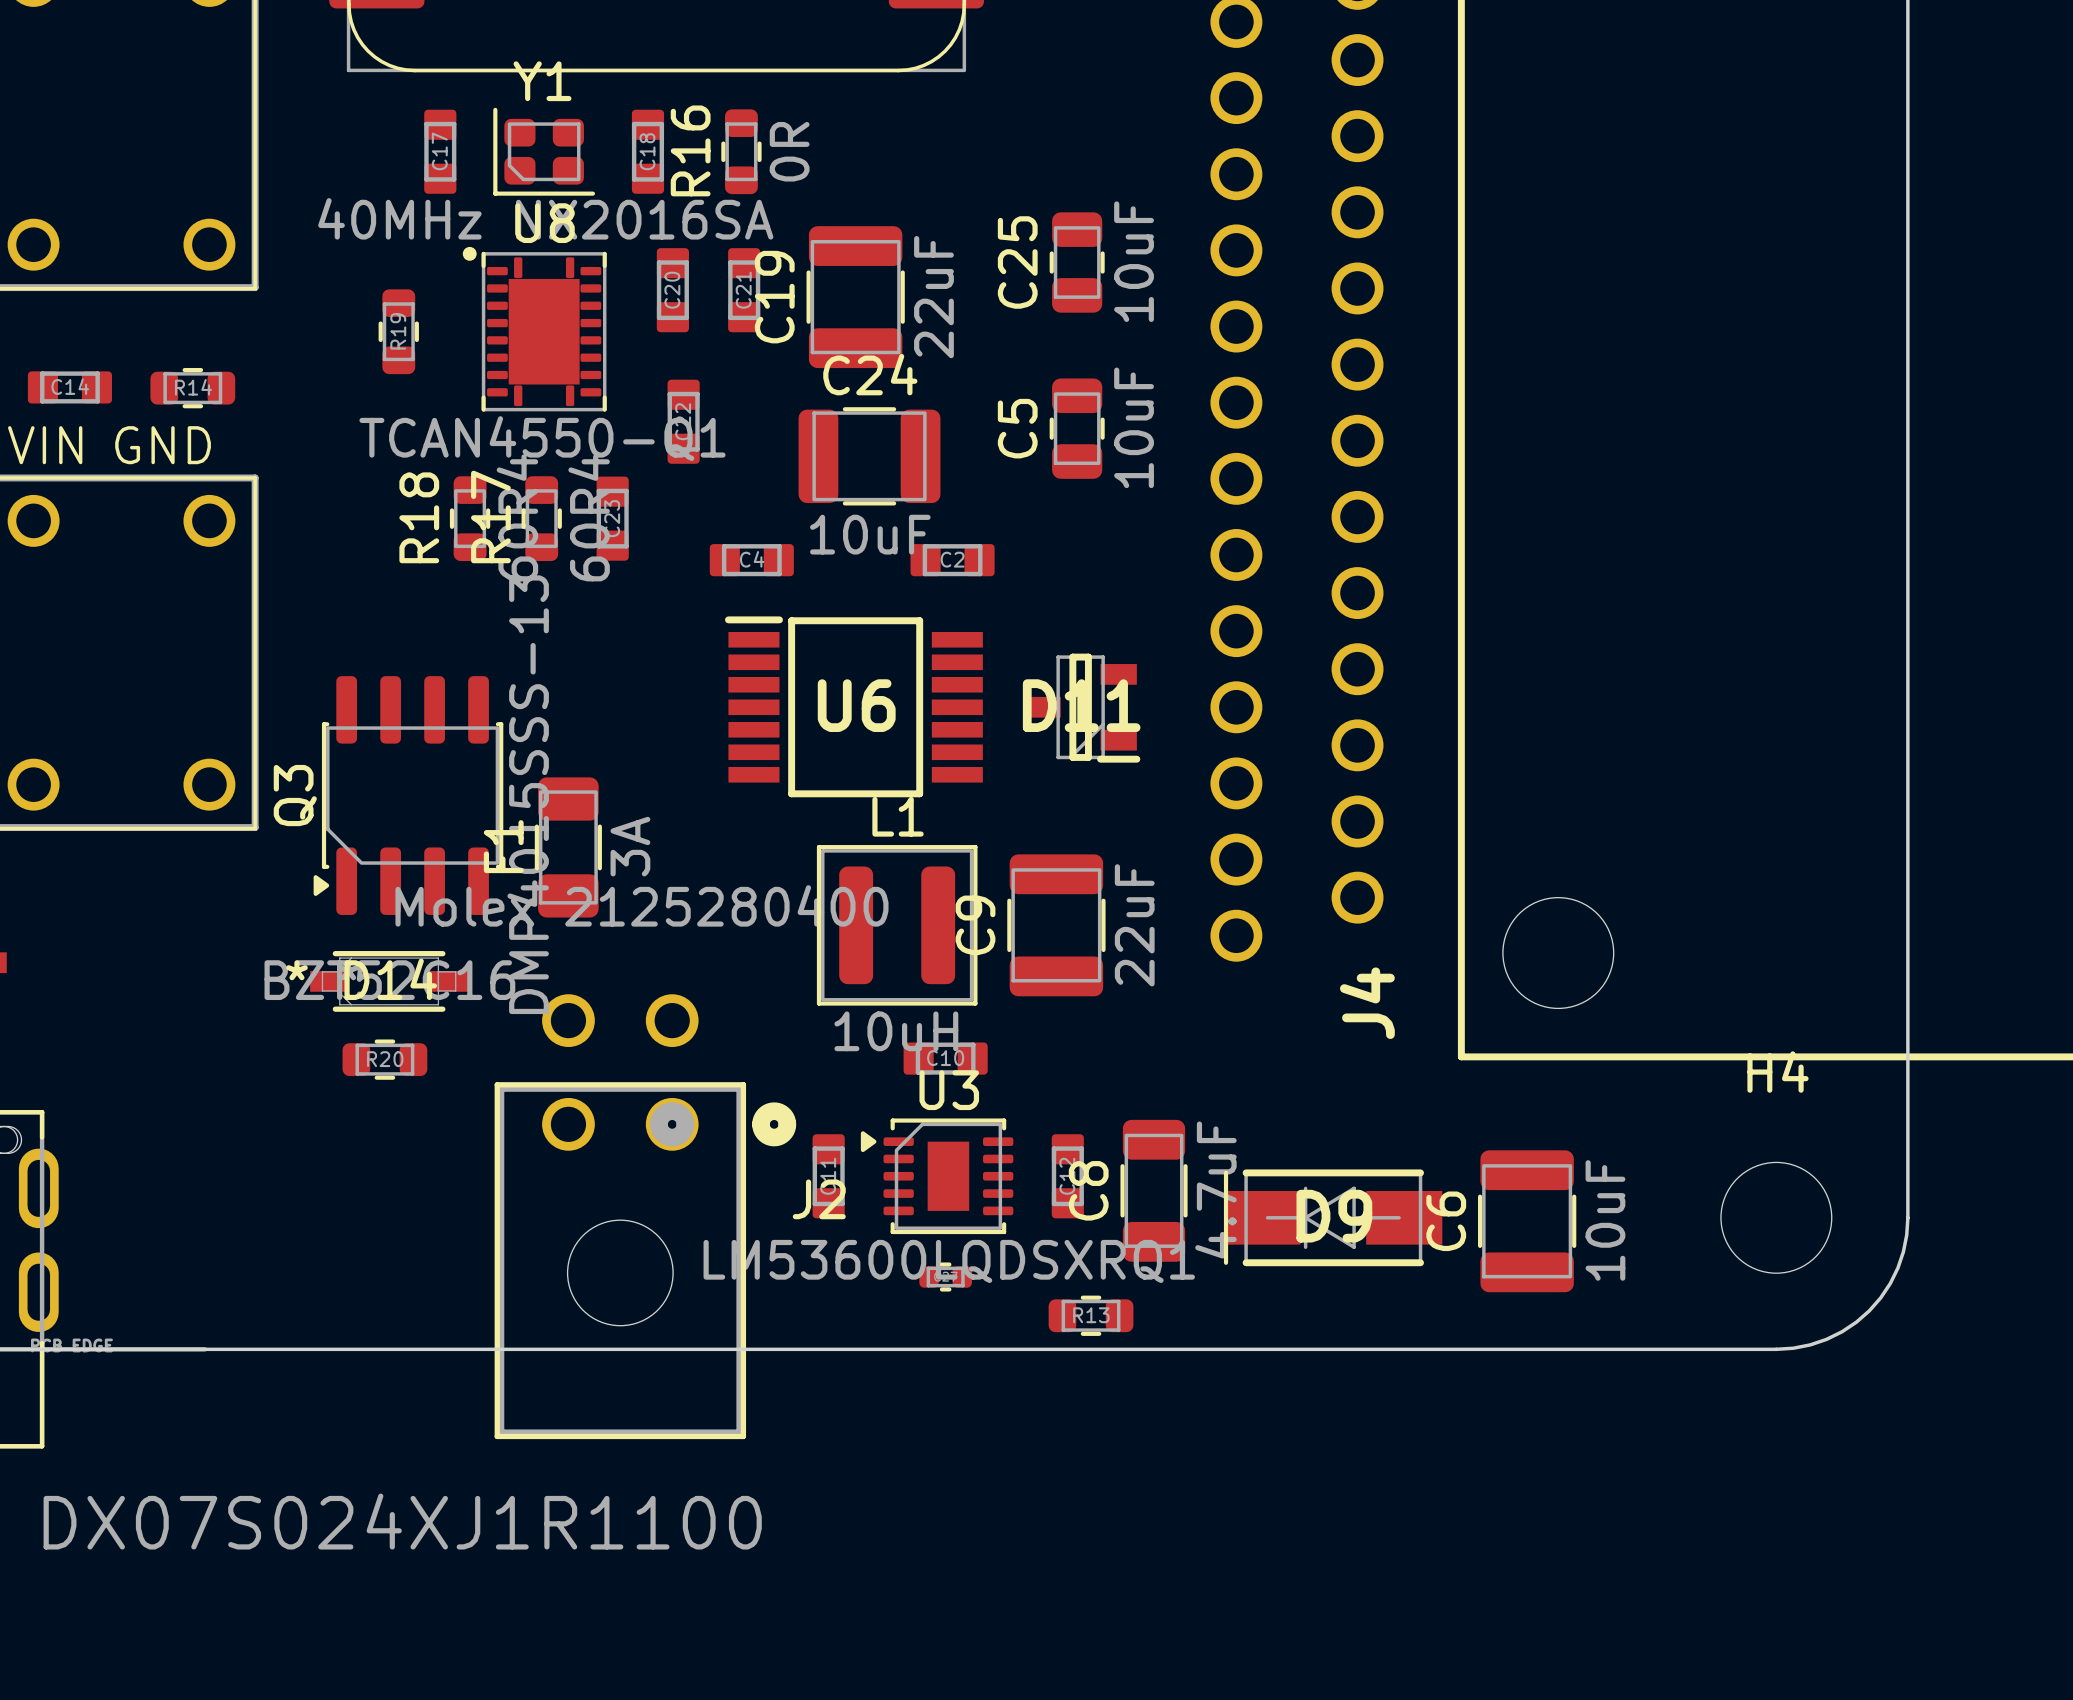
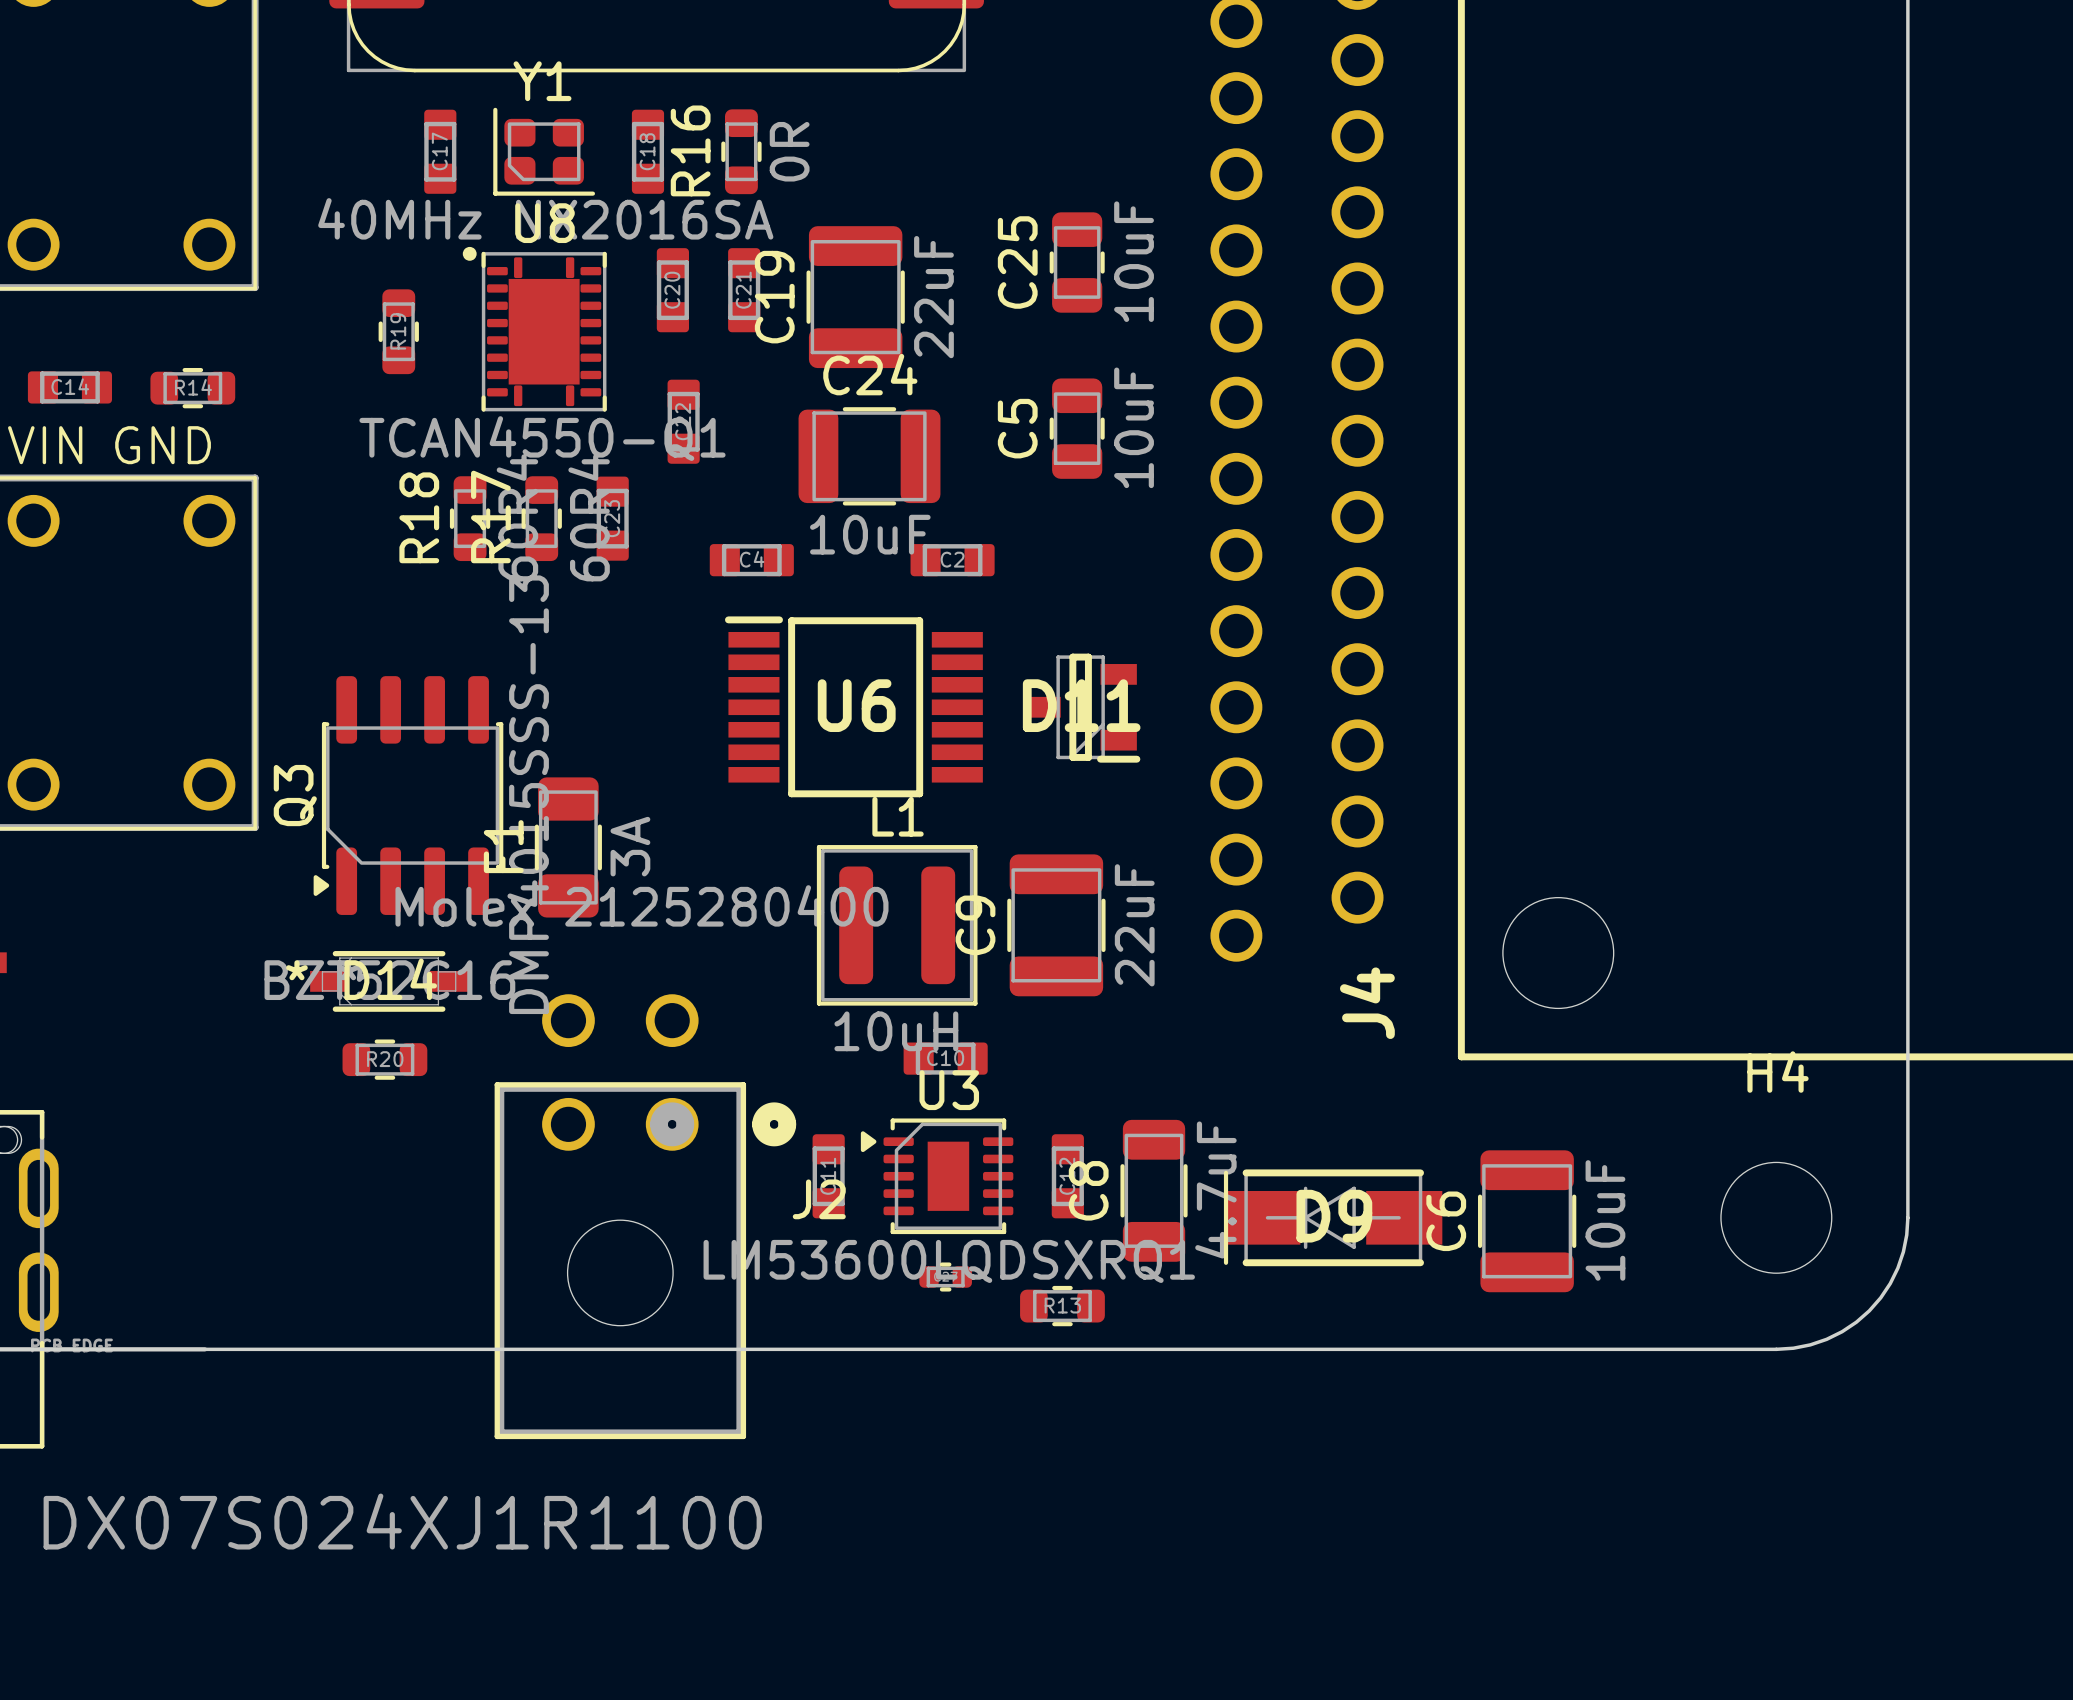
R13 position: (1091, 1315) -> (1062, 1306)

